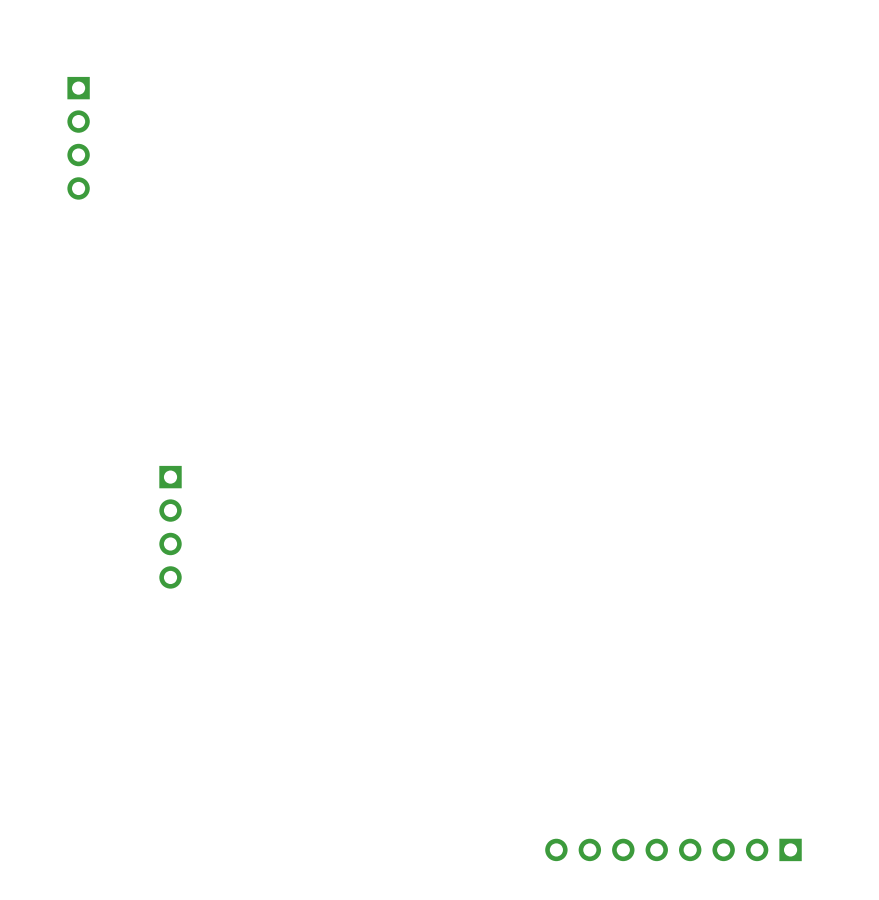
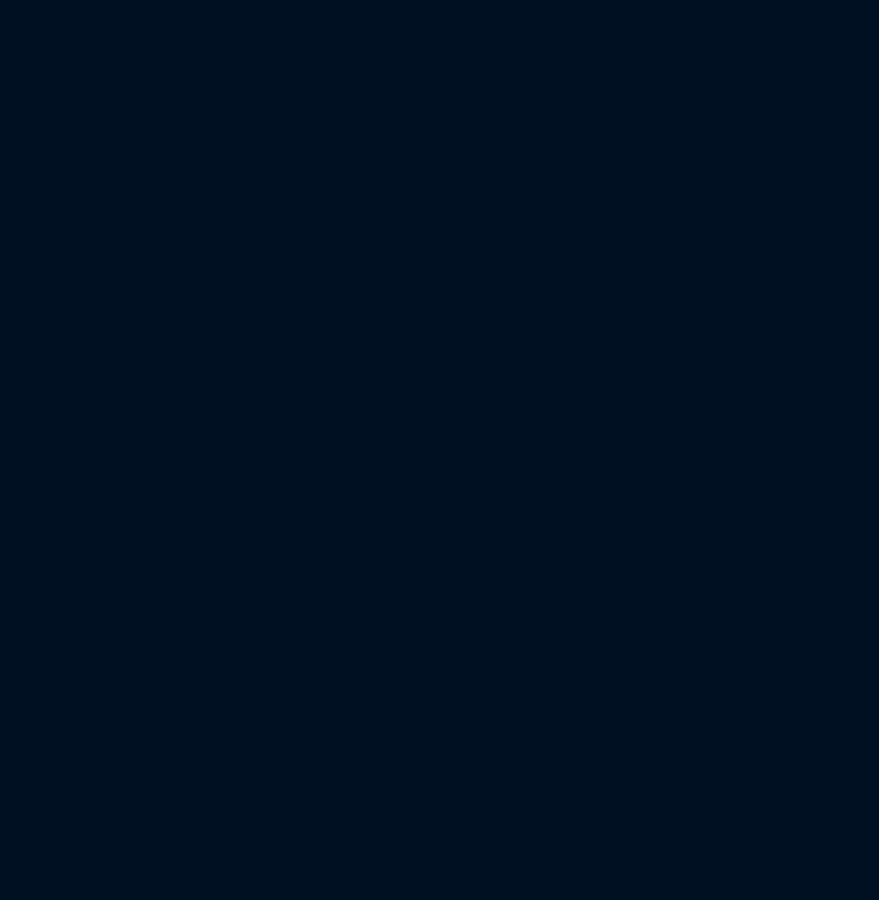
part: (78, 138) -> none
part: (170, 527) -> none
part: (673, 849) -> none

